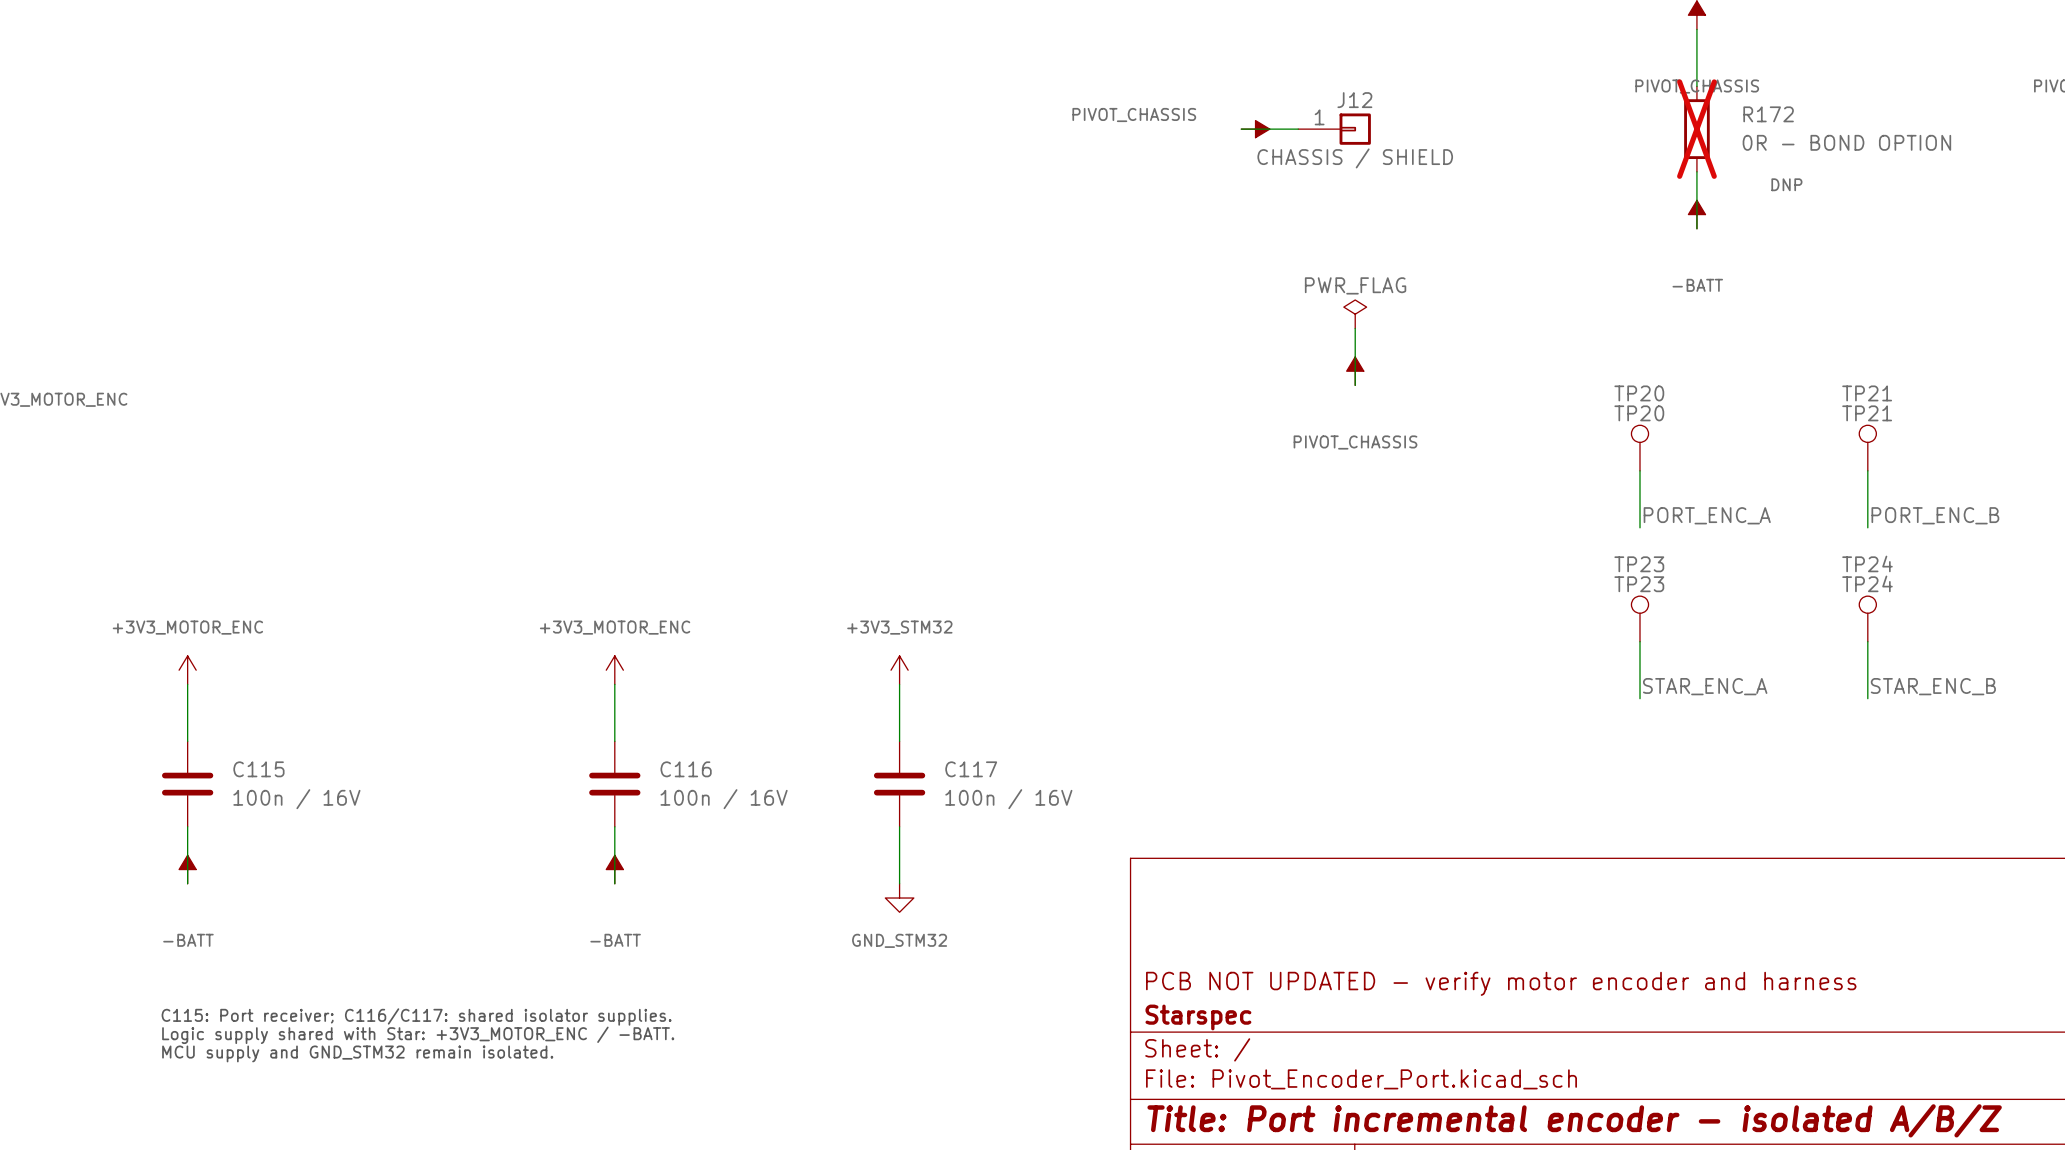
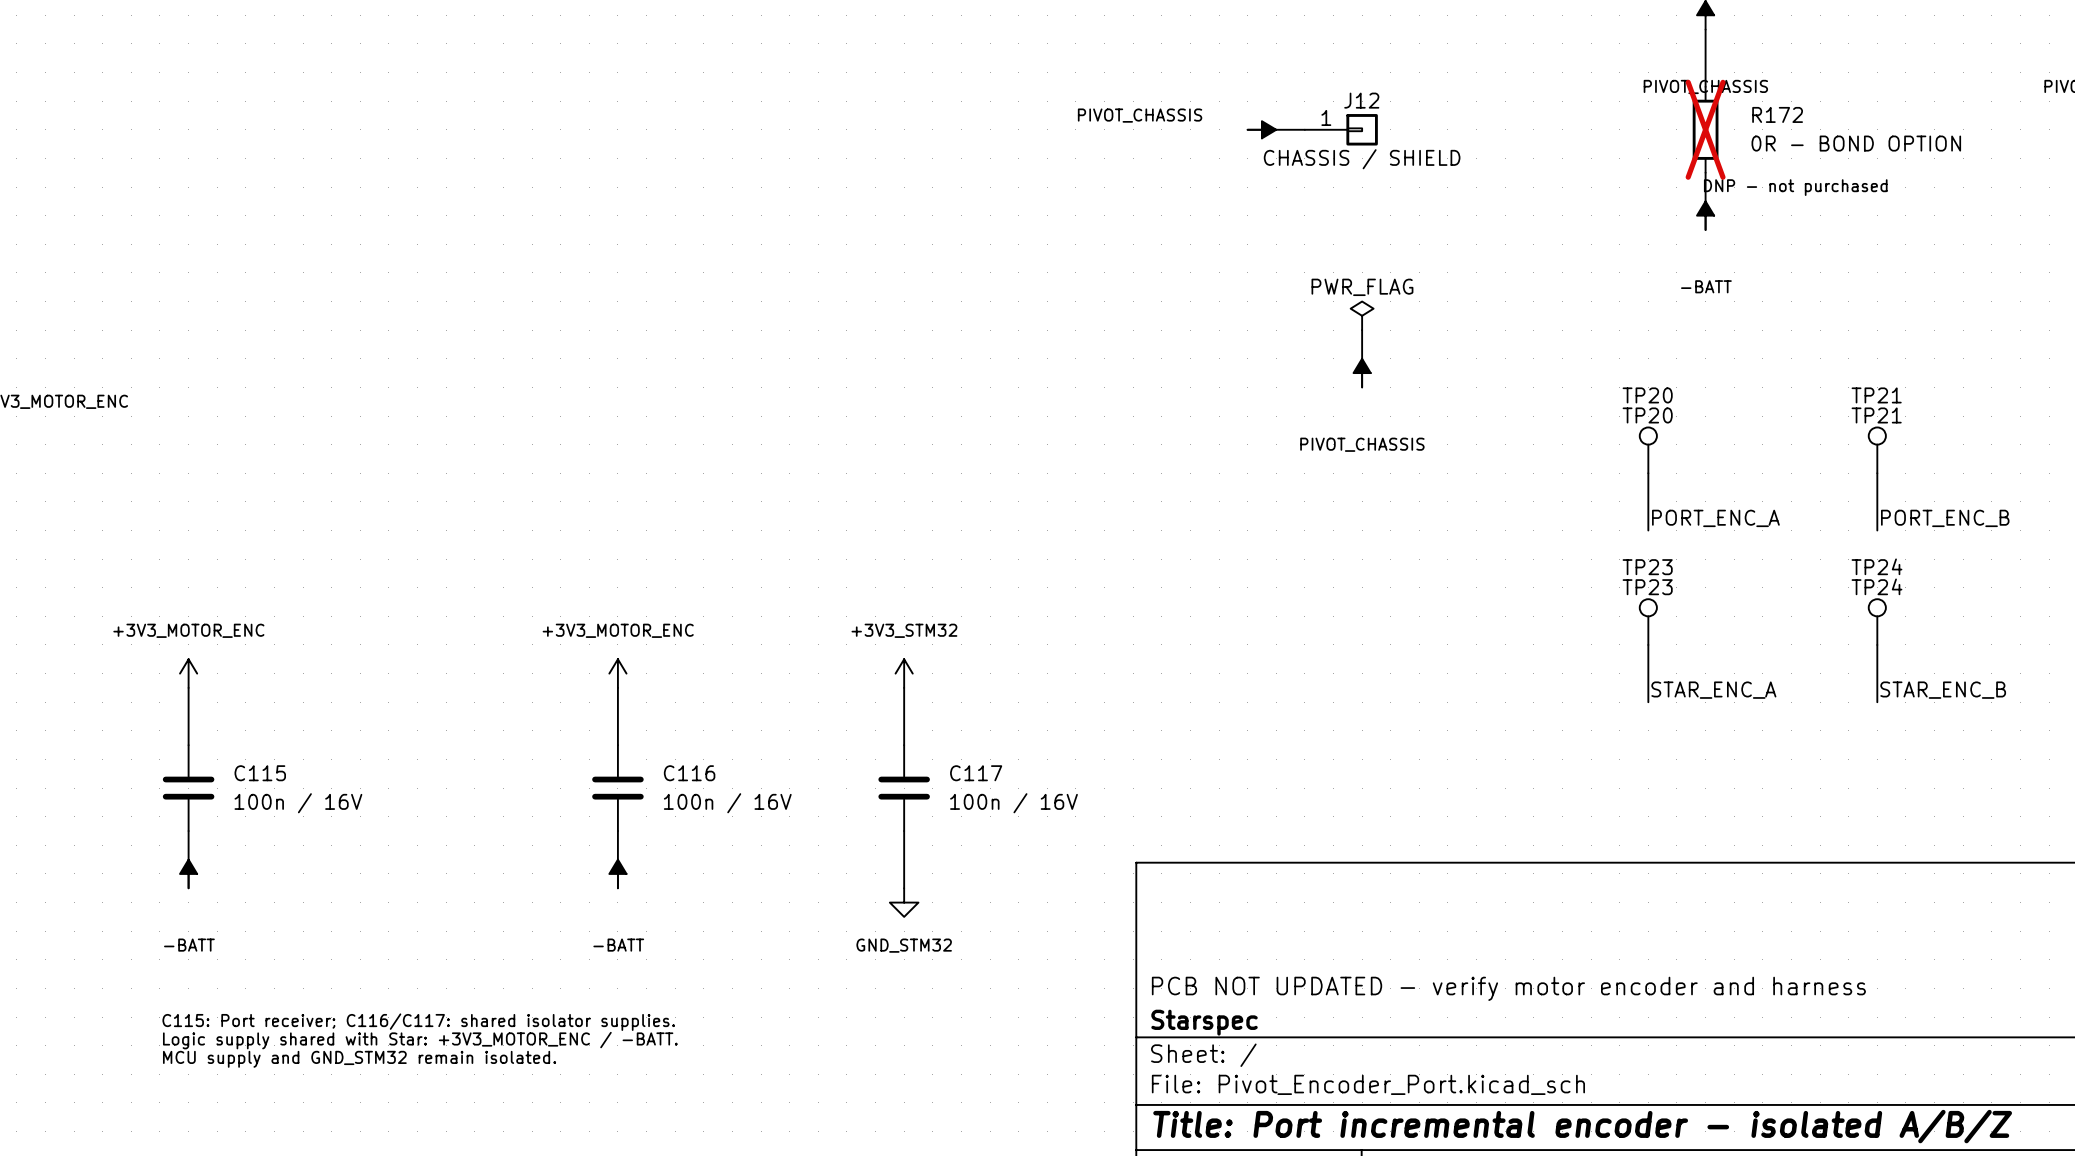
R172 text: DNP (1786, 184) -> DNP - not purchased (1795, 187)

